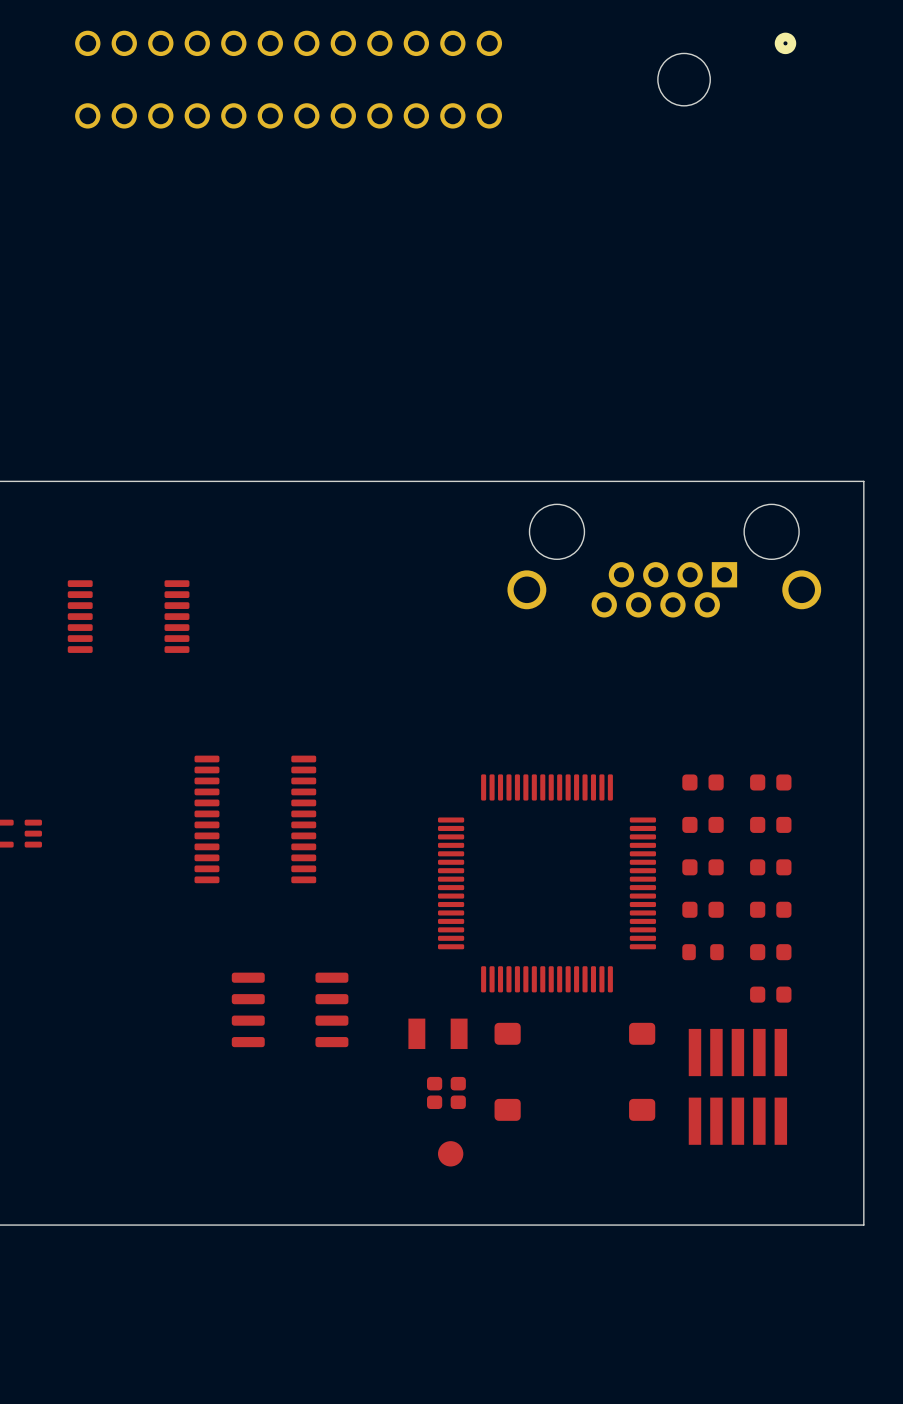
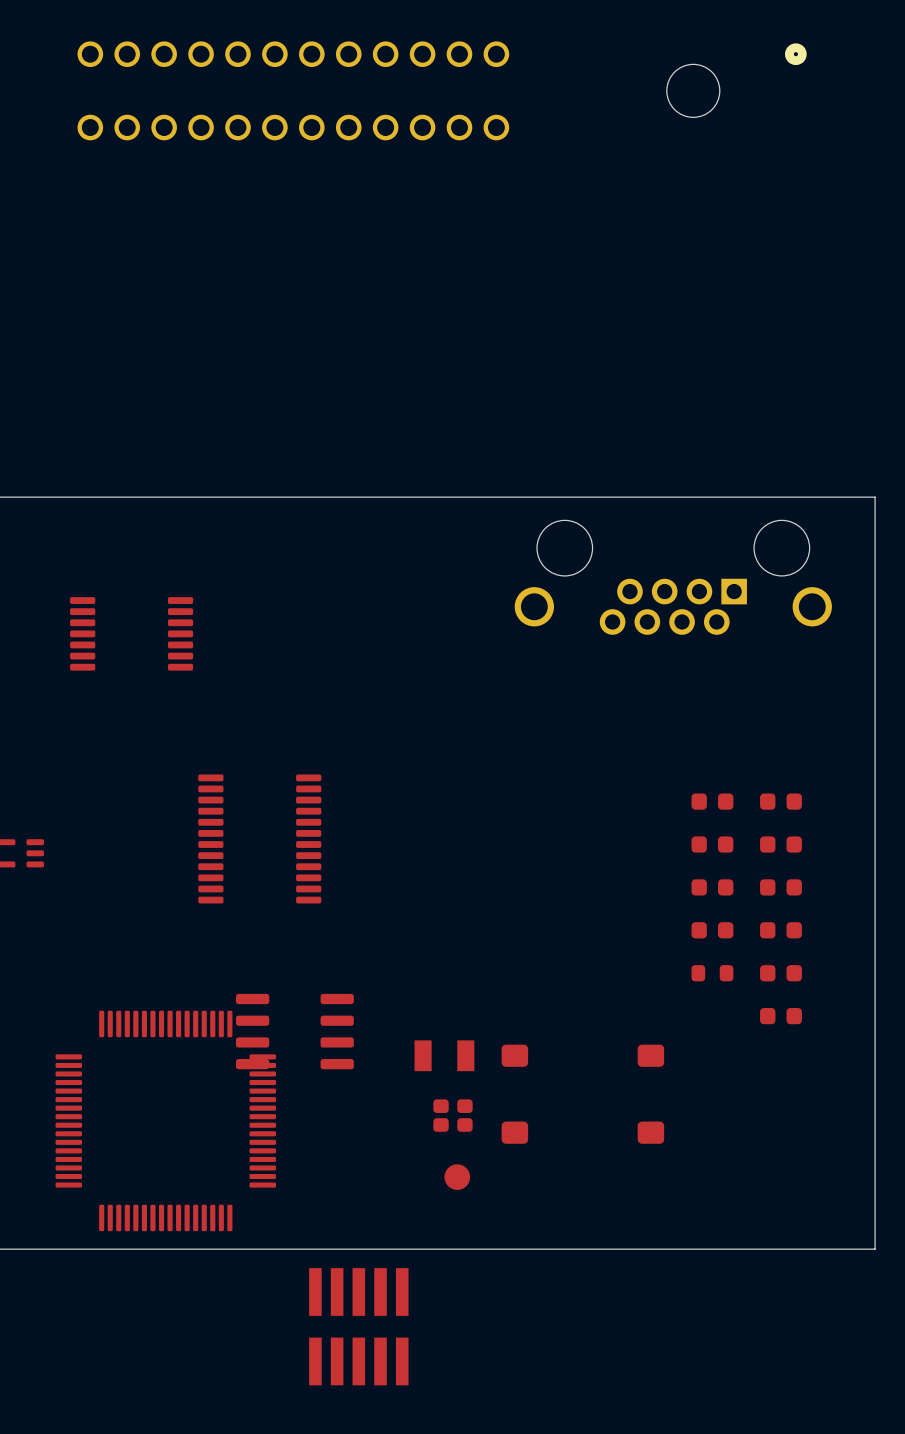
part: (547, 883) -> none
part: (737, 1086) -> none
part: none -> (165, 1120)
part: none -> (358, 1326)

